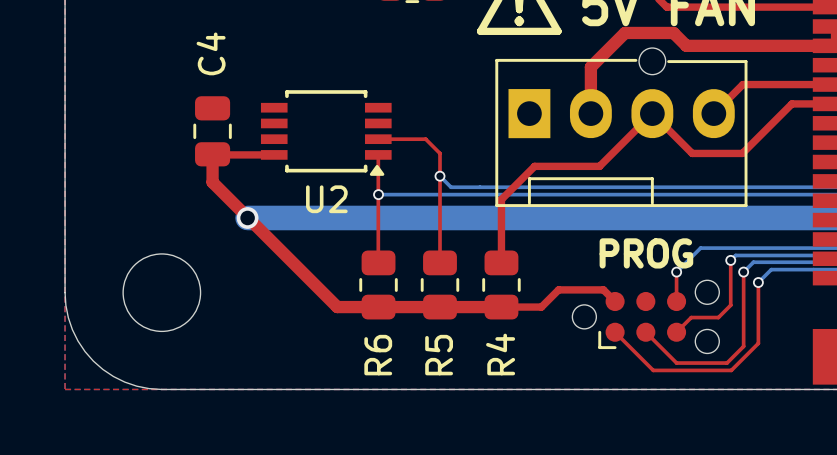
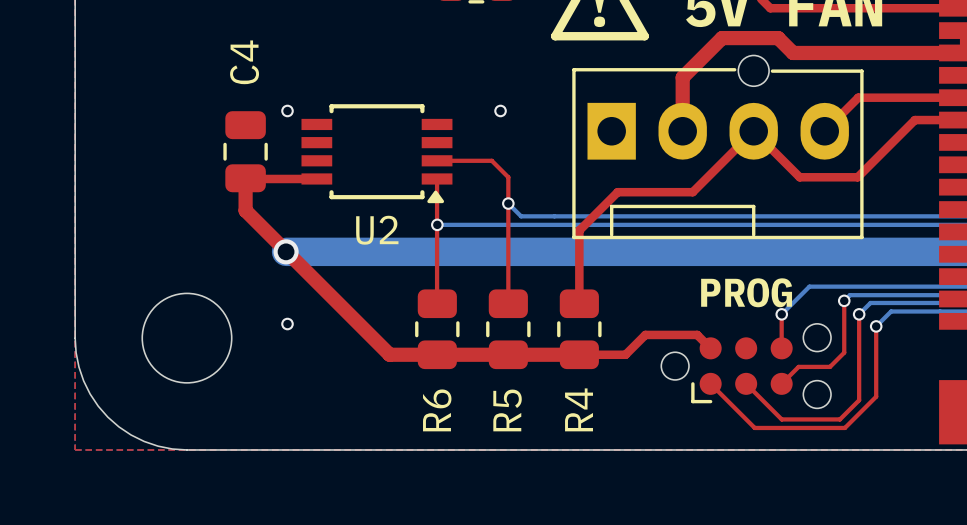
via: none -> (287, 110)
via: none -> (500, 110)
via: none -> (287, 324)

